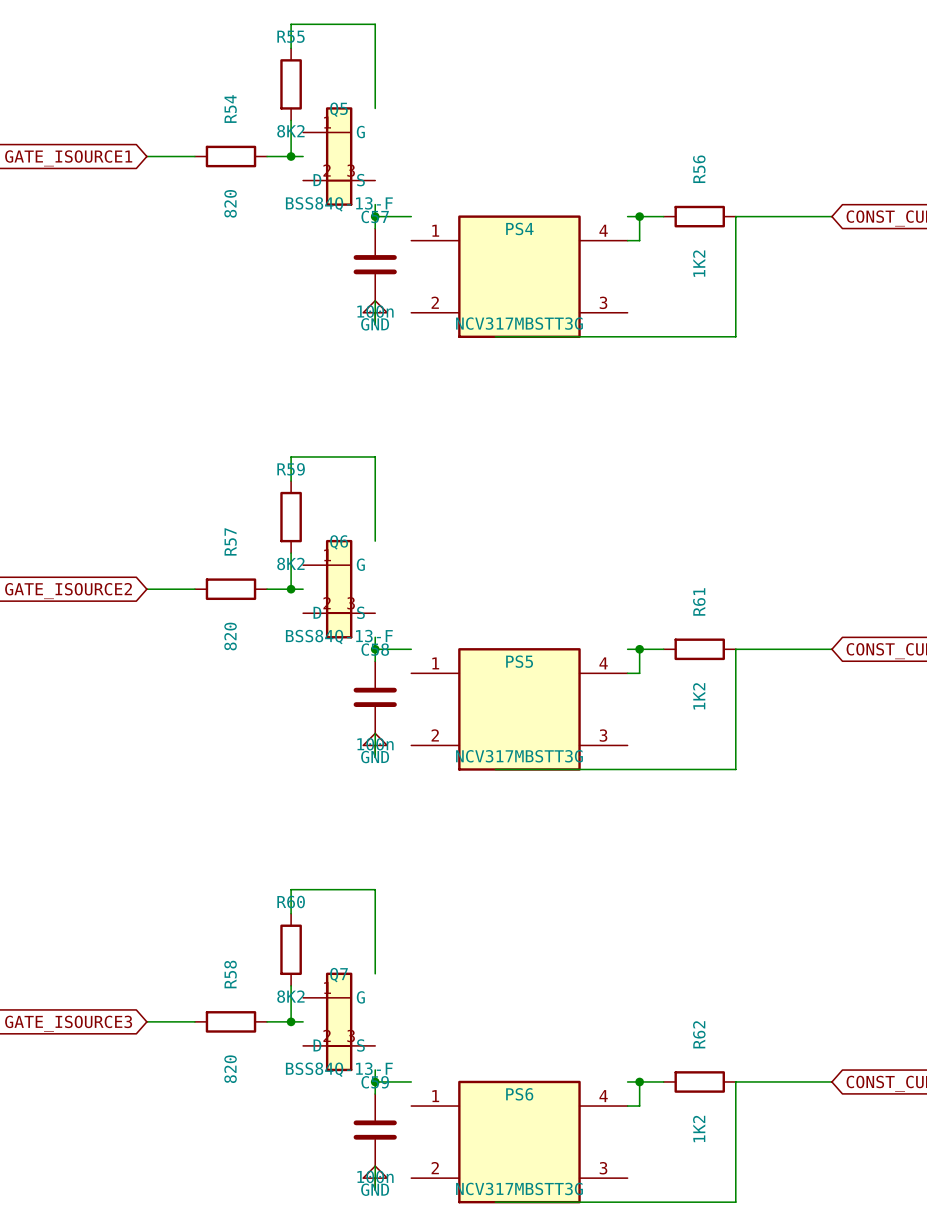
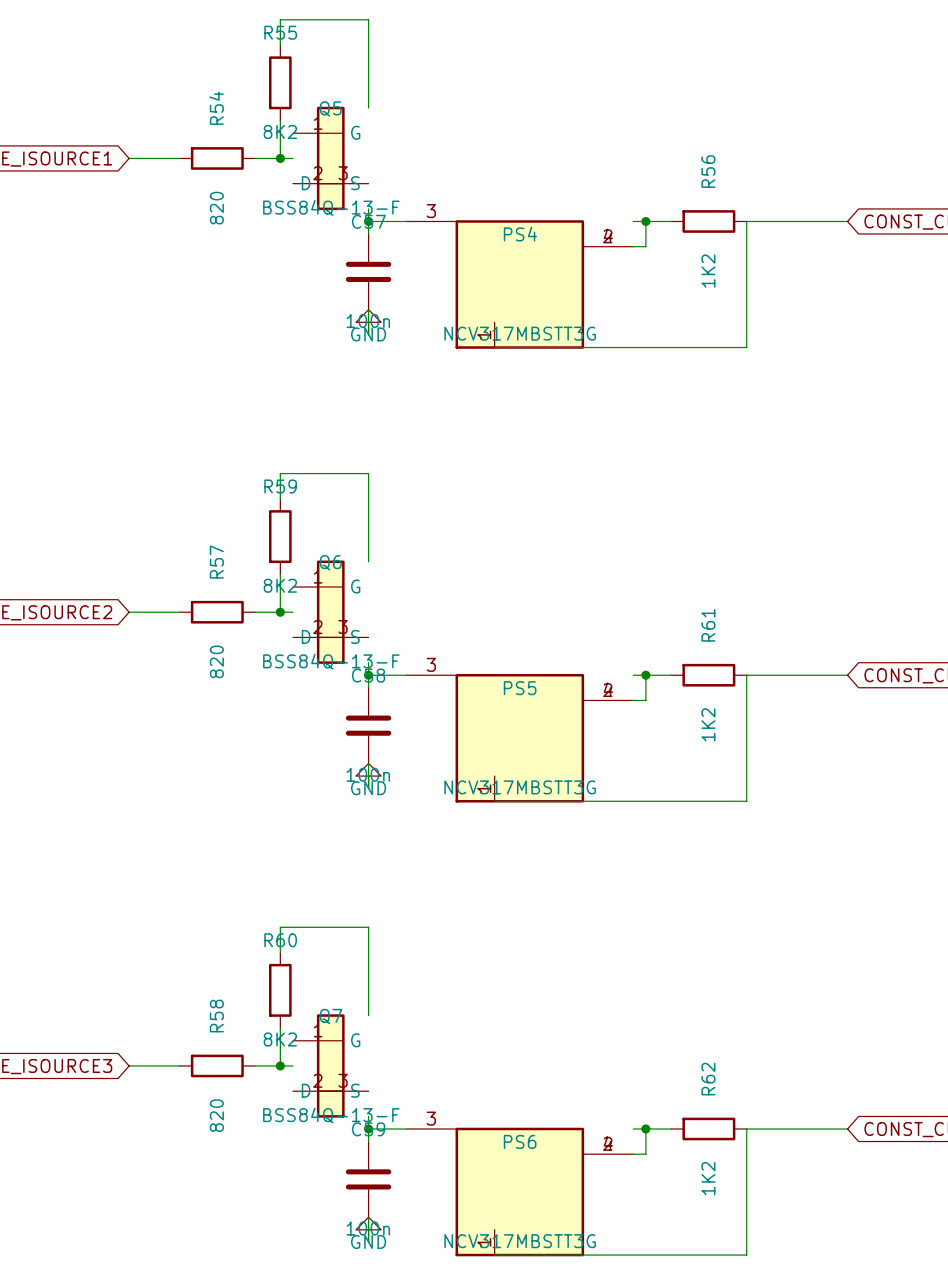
PS4 symbol: [411, 215, 628, 339] -> [406, 220, 634, 349]
PS5 symbol: [411, 648, 628, 771] -> [406, 673, 634, 803]
PS6 symbol: [411, 1080, 628, 1204] -> [406, 1127, 634, 1257]

